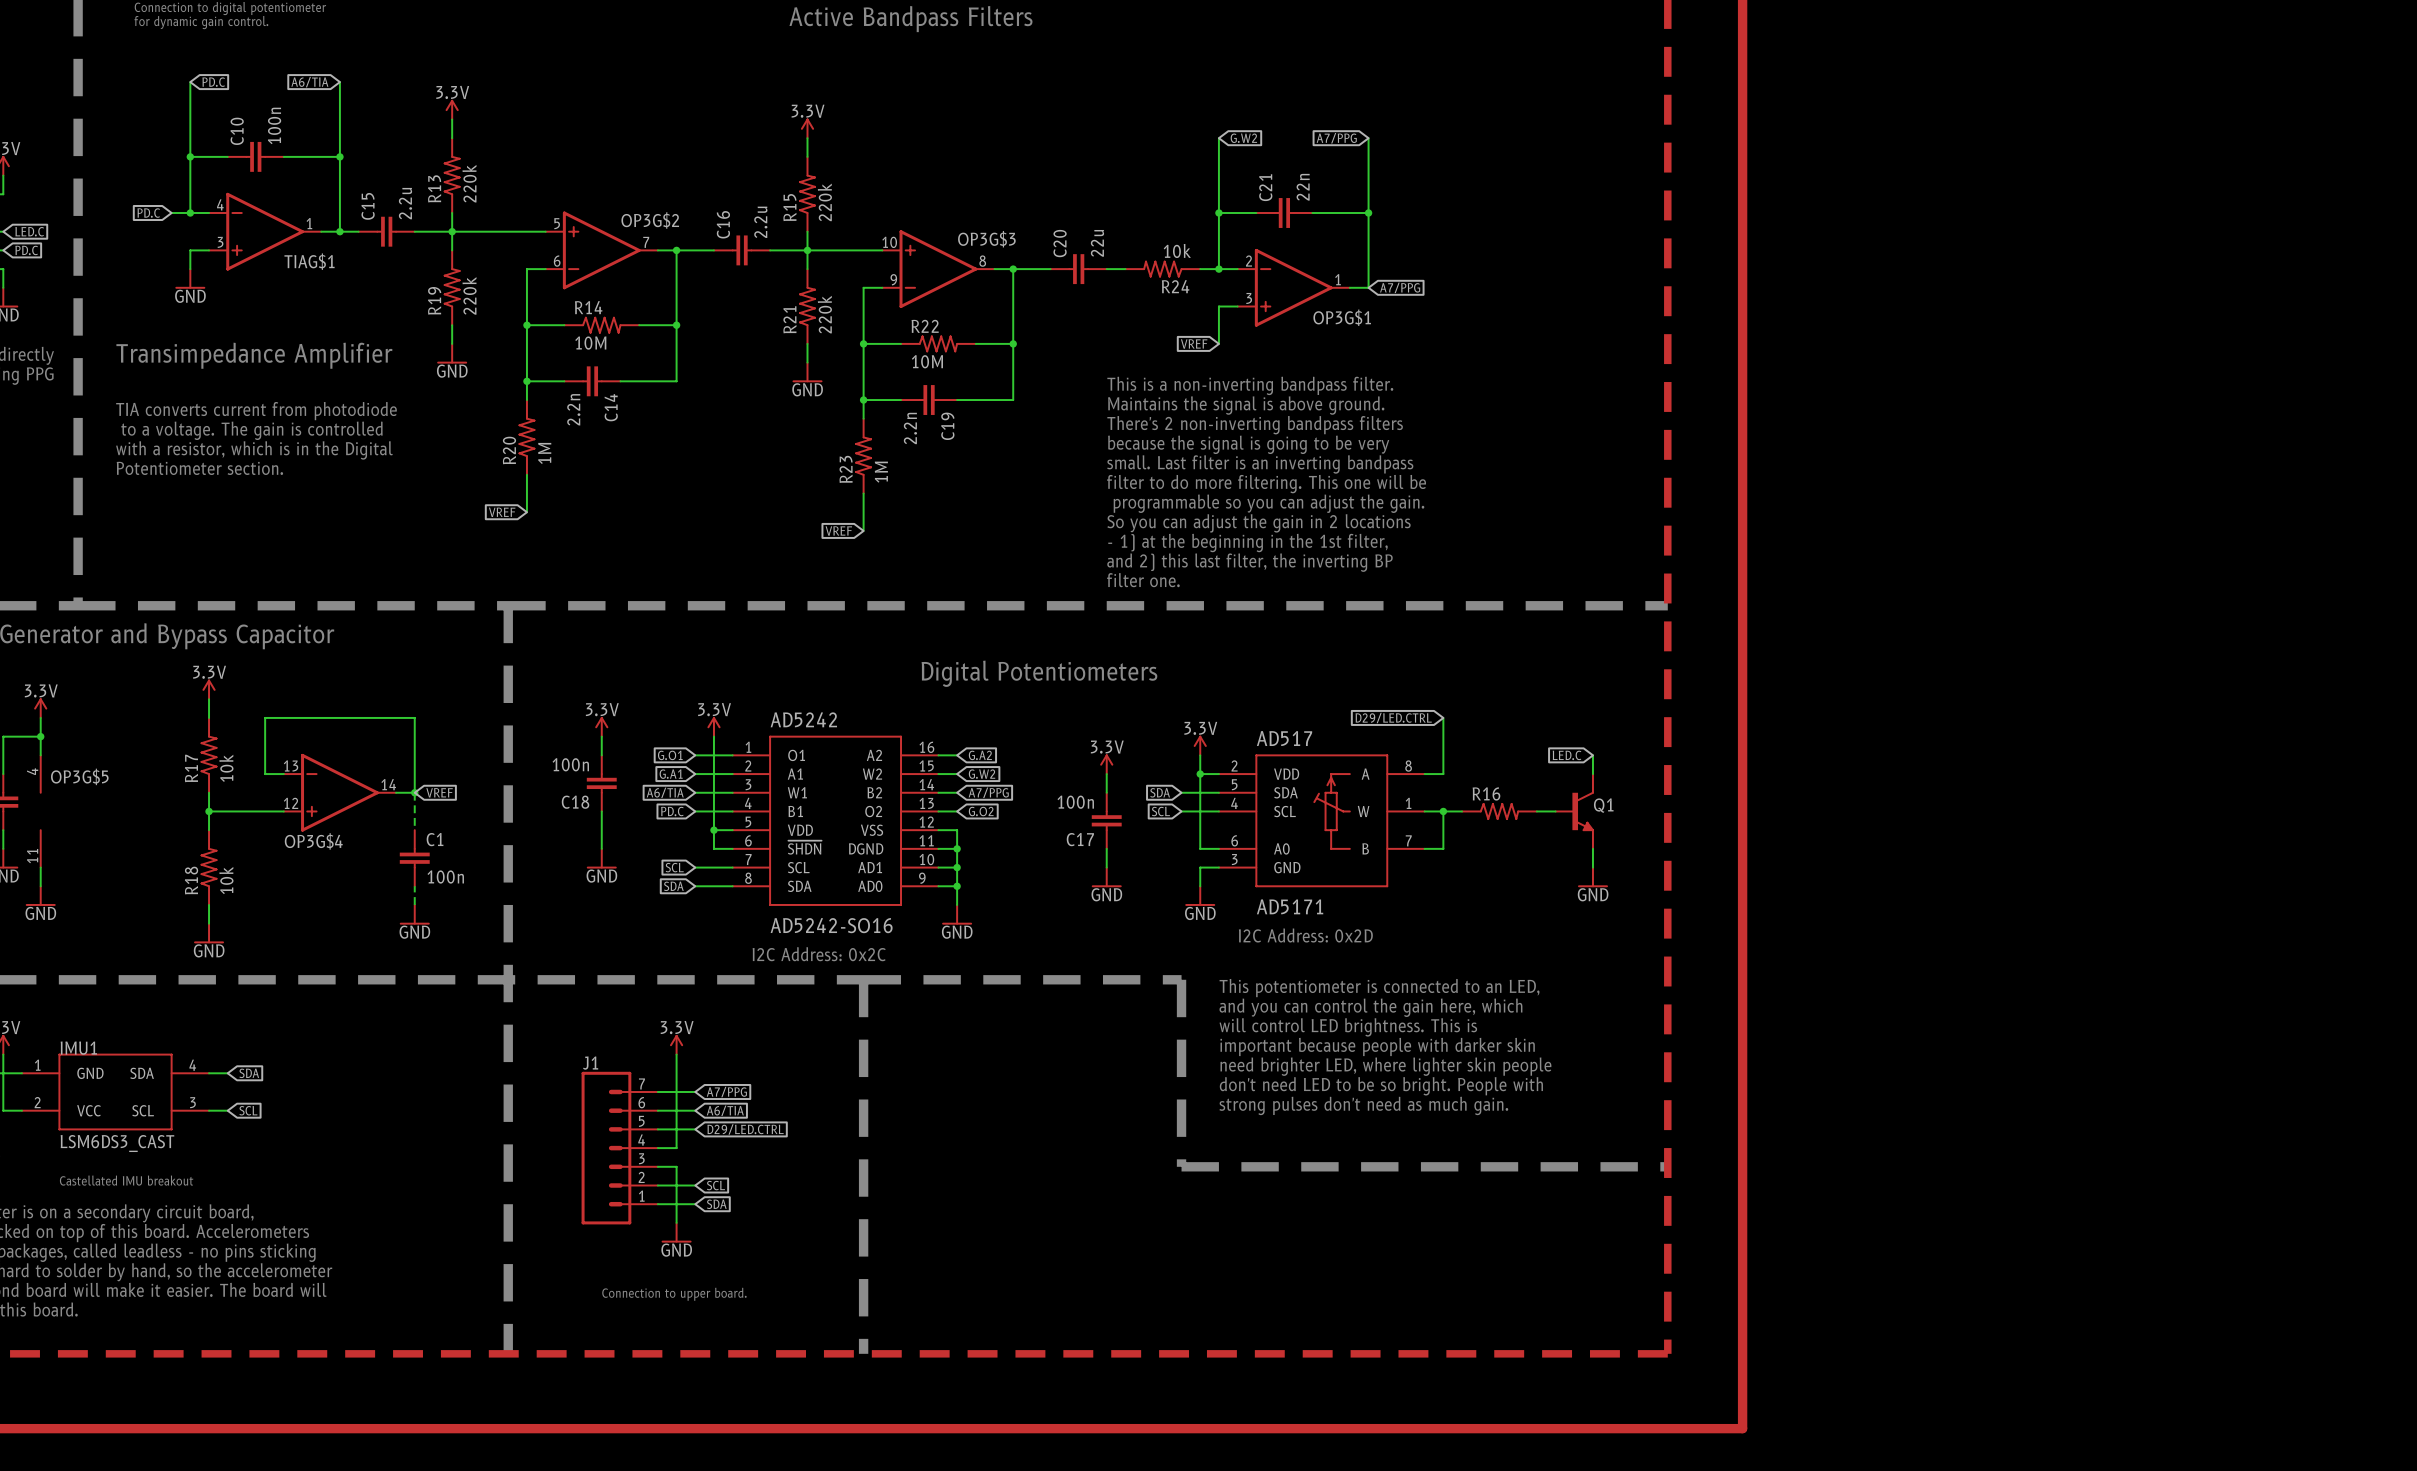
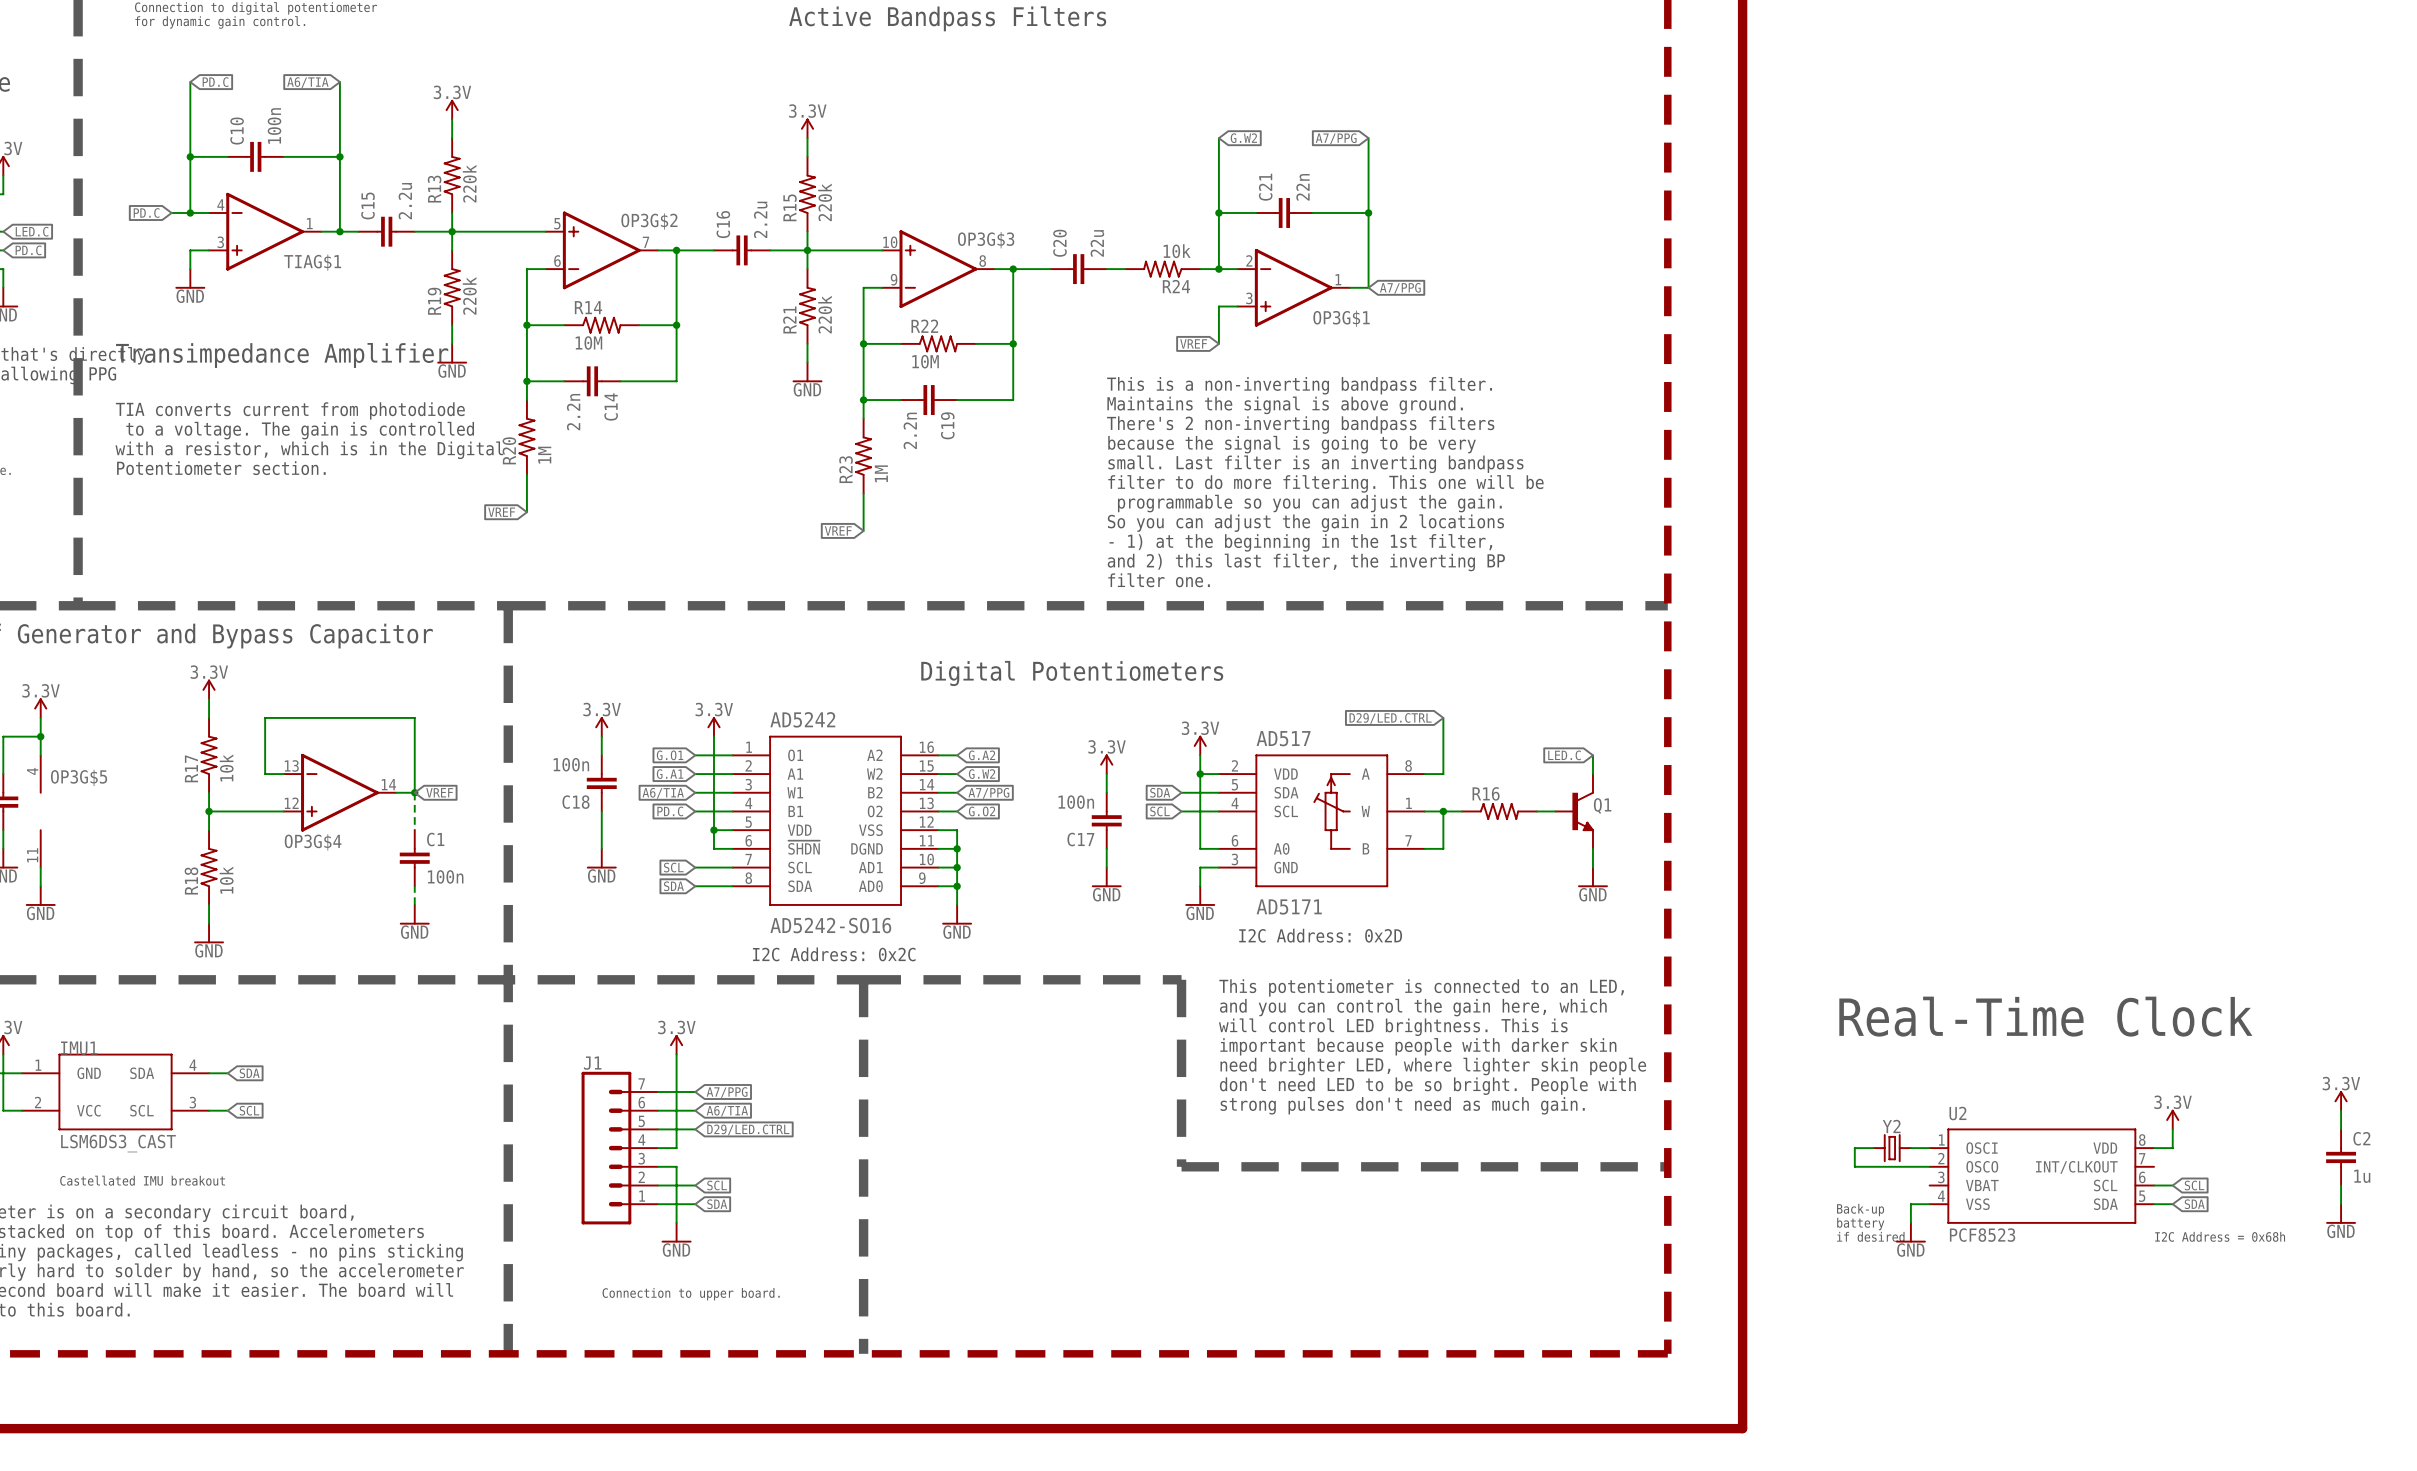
text: none -> Real-Time Clock (2045, 1016)
power symbol: none -> 3.3V (2341, 1100)
wire: none -> (2341, 1110) (2341, 1129)
power symbol: none -> 3.3V (2172, 1119)
wire: none -> (2172, 1129) (2172, 1148) (2154, 1148)
wire: none -> (1873, 1148) (1854, 1148) (1854, 1166) (1929, 1166)
Y2: none -> (1892, 1148)
wire: none -> (1910, 1148) (1929, 1148)
C2: none -> 1u (2341, 1157)
U2: none -> PCF8523 (2041, 1176)
wire: none -> (2154, 1185) (2172, 1185)
global label: none -> SCL (2194, 1185)
wire: none -> (2341, 1185) (2341, 1204)
wire: none -> (1929, 1204) (1910, 1204) (1910, 1222)
wire: none -> (2154, 1204) (2172, 1204)
global label: none -> SDA (2194, 1204)
text: none -> Back-up (1860, 1210)
power symbol: none -> GND (2341, 1214)
text: none -> battery (1860, 1224)
power symbol: none -> GND (1910, 1232)
text: none -> if desired (1870, 1236)
text: none -> I2C Address = 0x68h (2220, 1236)

